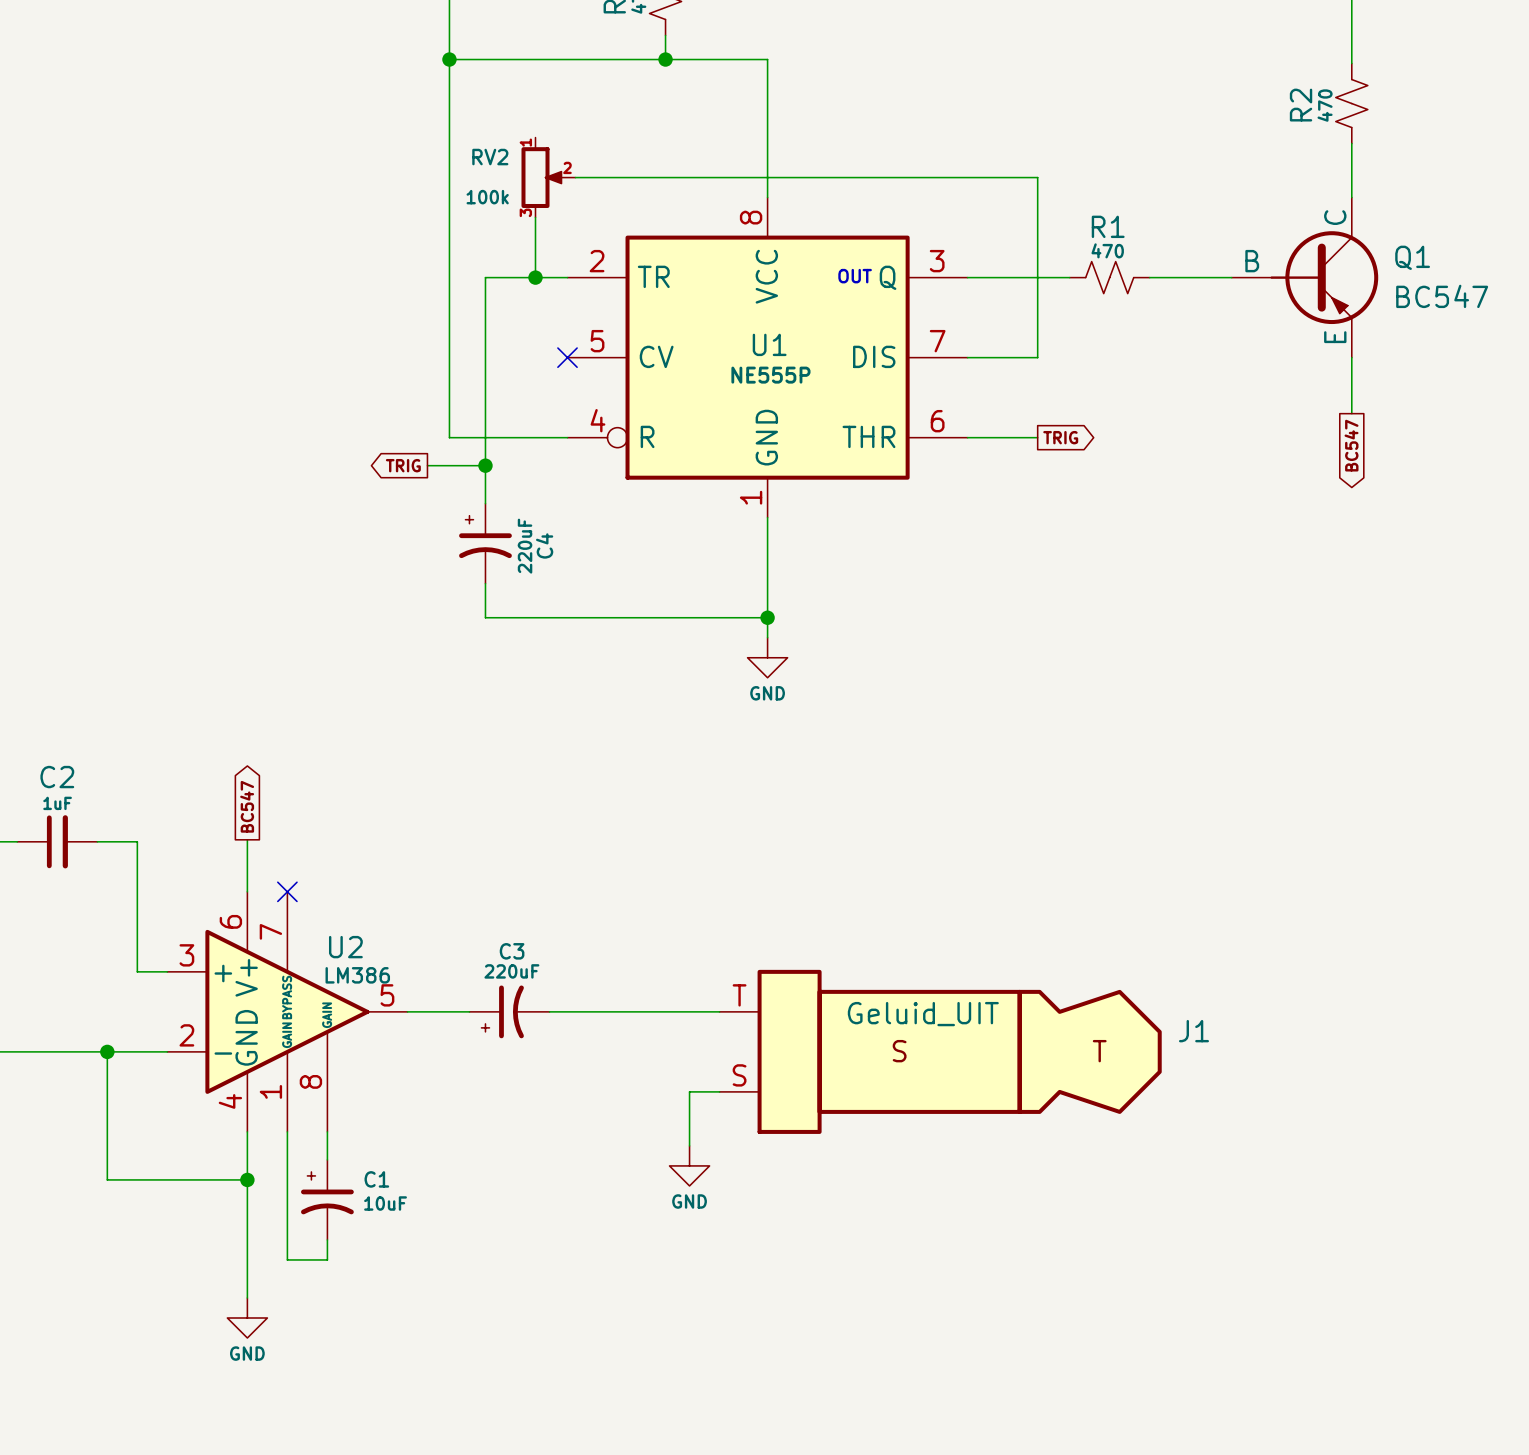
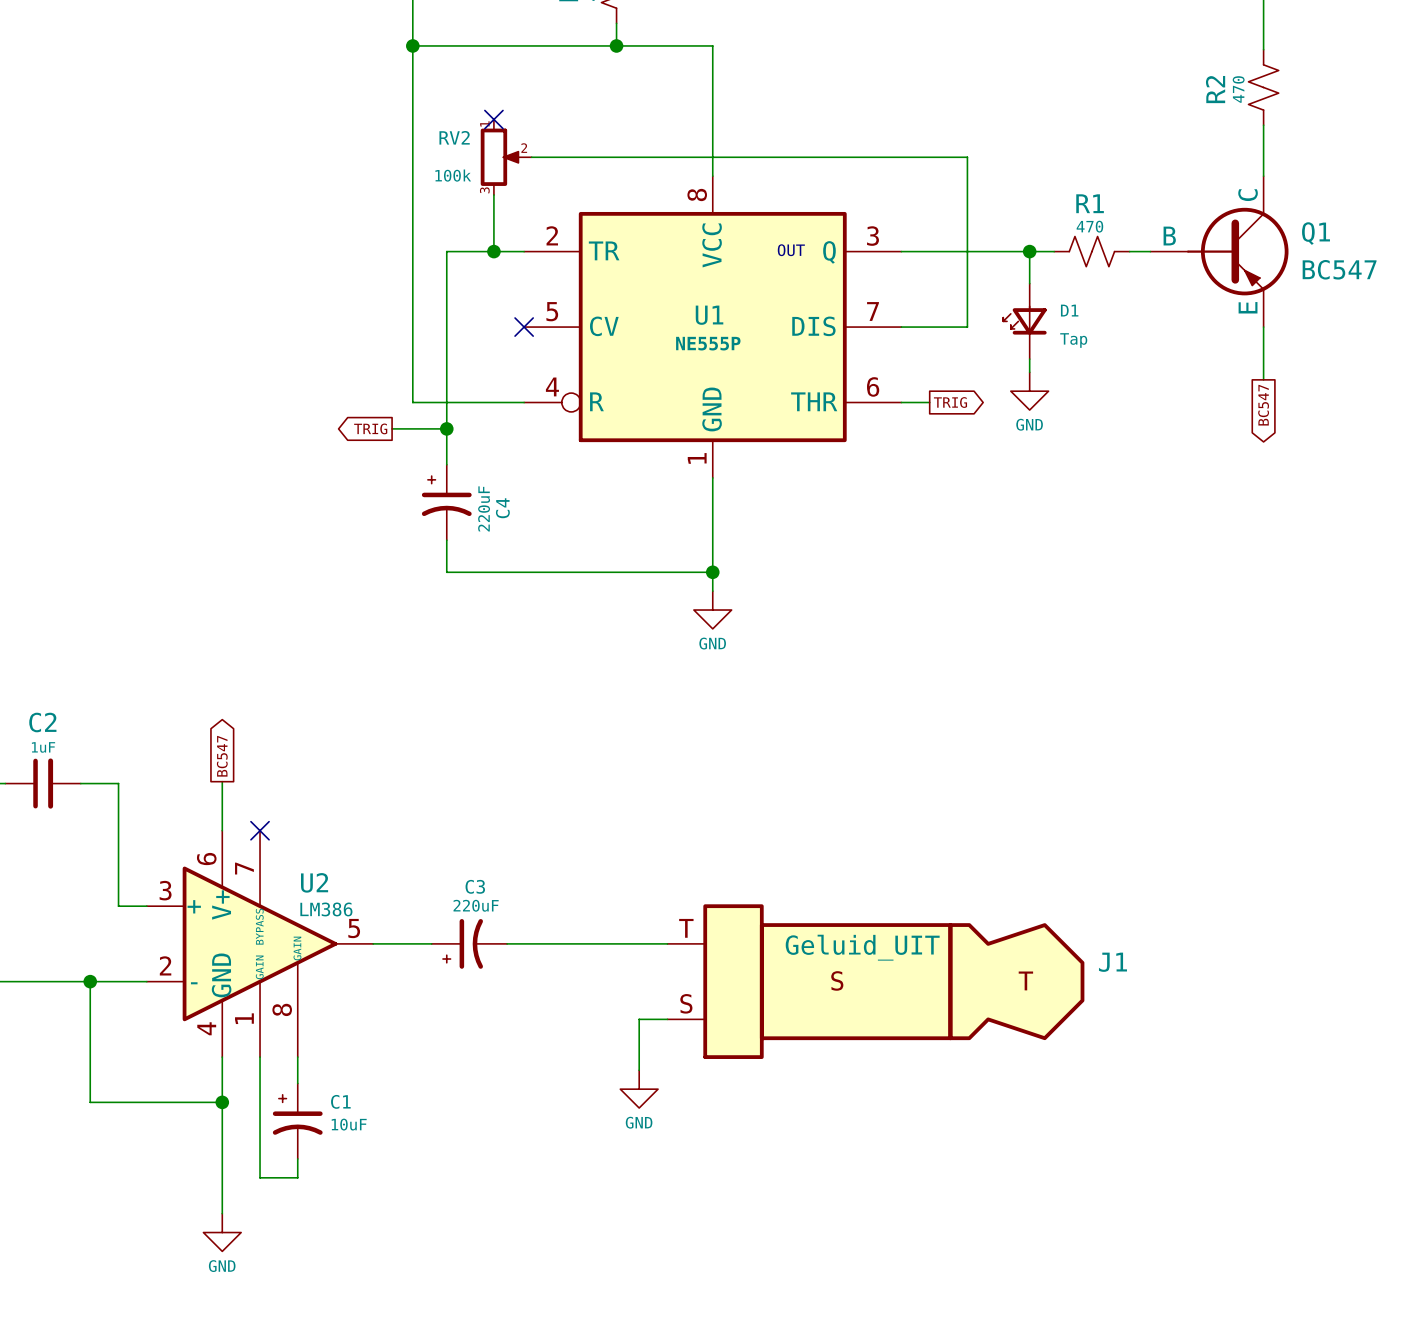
no-connect mark: none -> (493, 119)
wire: none -> (1029, 251) (1029, 283)
junction: none -> (1029, 251)
R1 position: (1109, 277) -> (1091, 251)
wire: (1149, 277) (1209, 277) -> (997, 251) (1054, 251)
D1: none -> Tap (1024, 321)
wire: none -> (1029, 359) (1029, 372)
power symbol: none -> GND (1029, 391)
wire: (997, 437) (1037, 437) -> none
global label position: TRIG (1060, 437) -> TRIG (950, 402)

